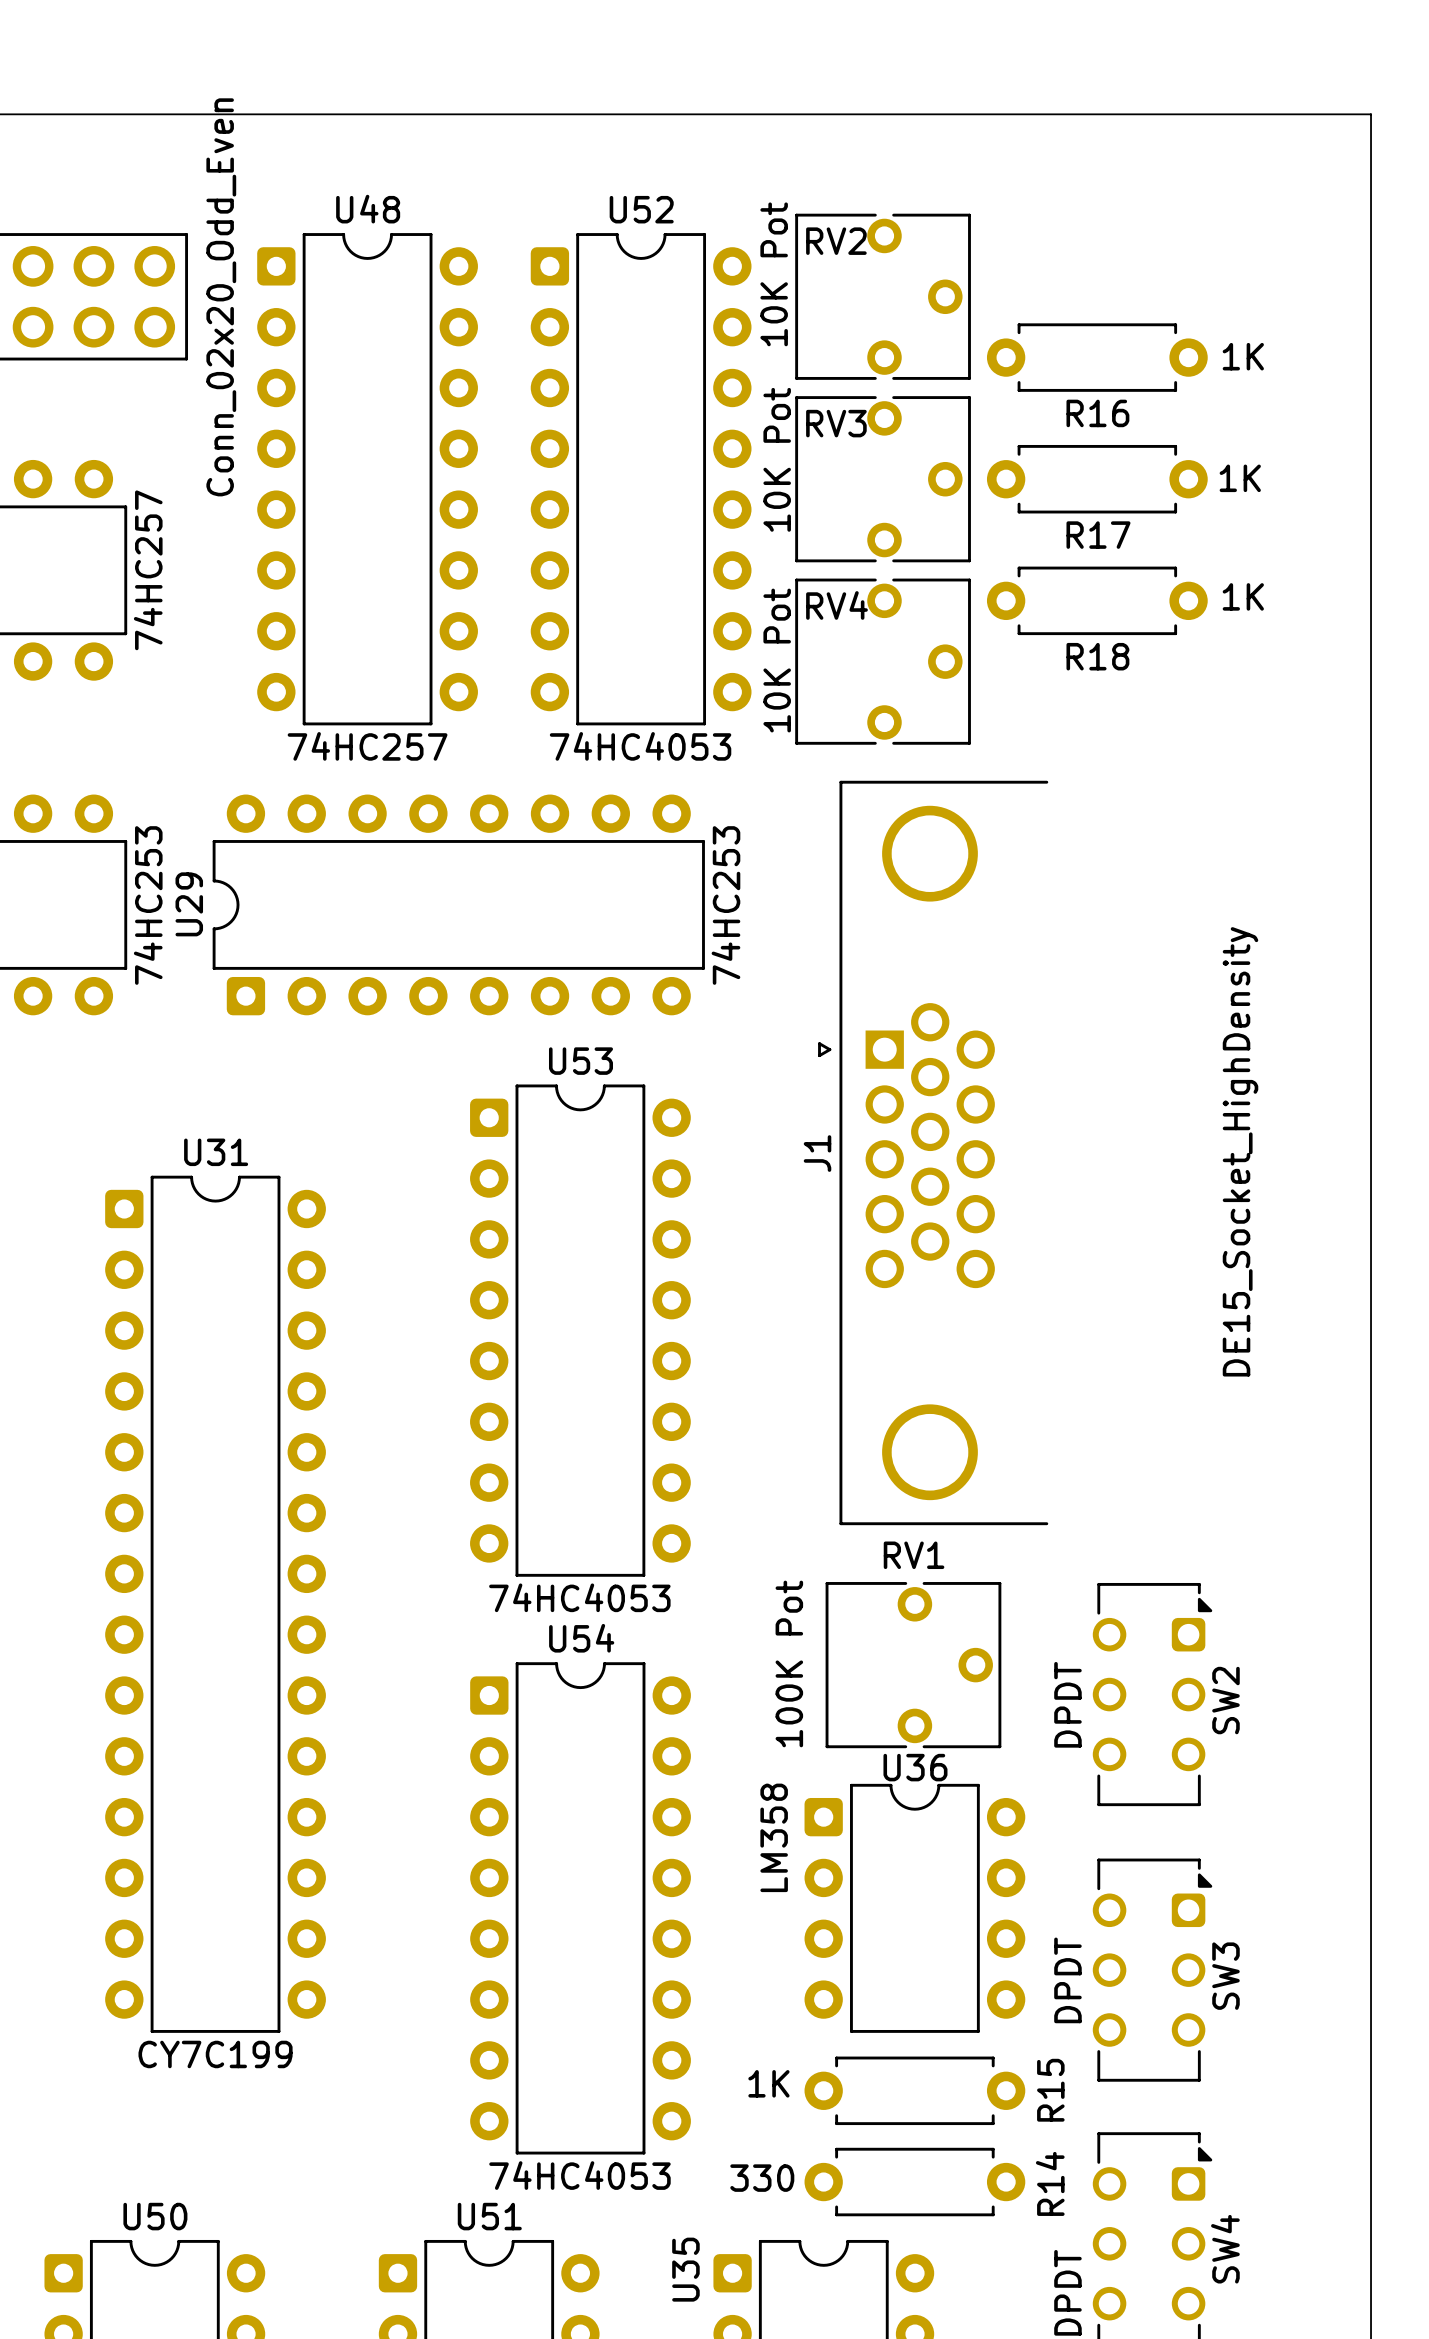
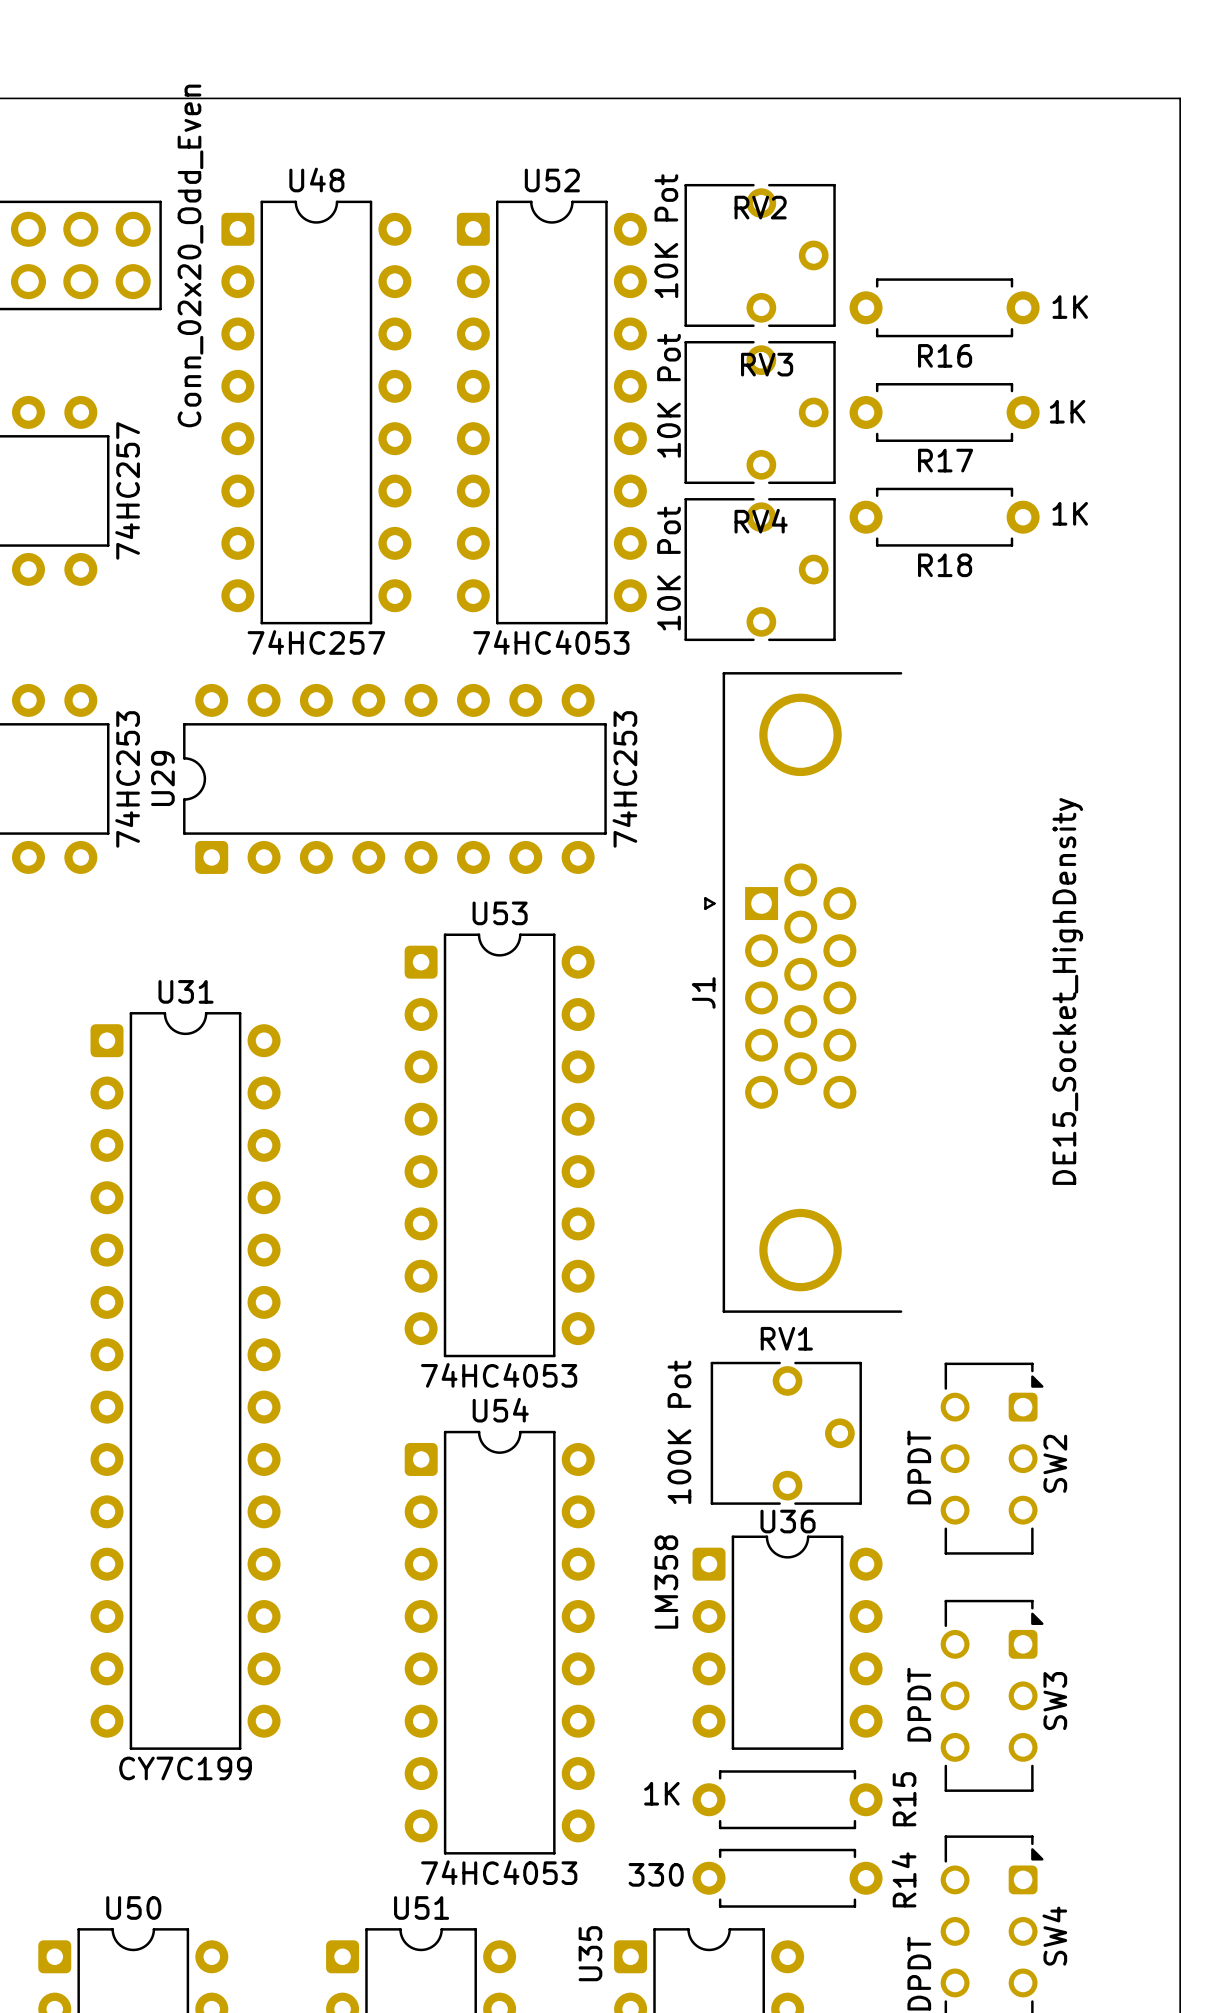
RV2 name position: RV2 (836, 241) -> RV2 (760, 207)
RV3 name position: RV3 (836, 423) -> RV3 (767, 364)
RV4 name position: RV4 (836, 605) -> RV4 (761, 521)

